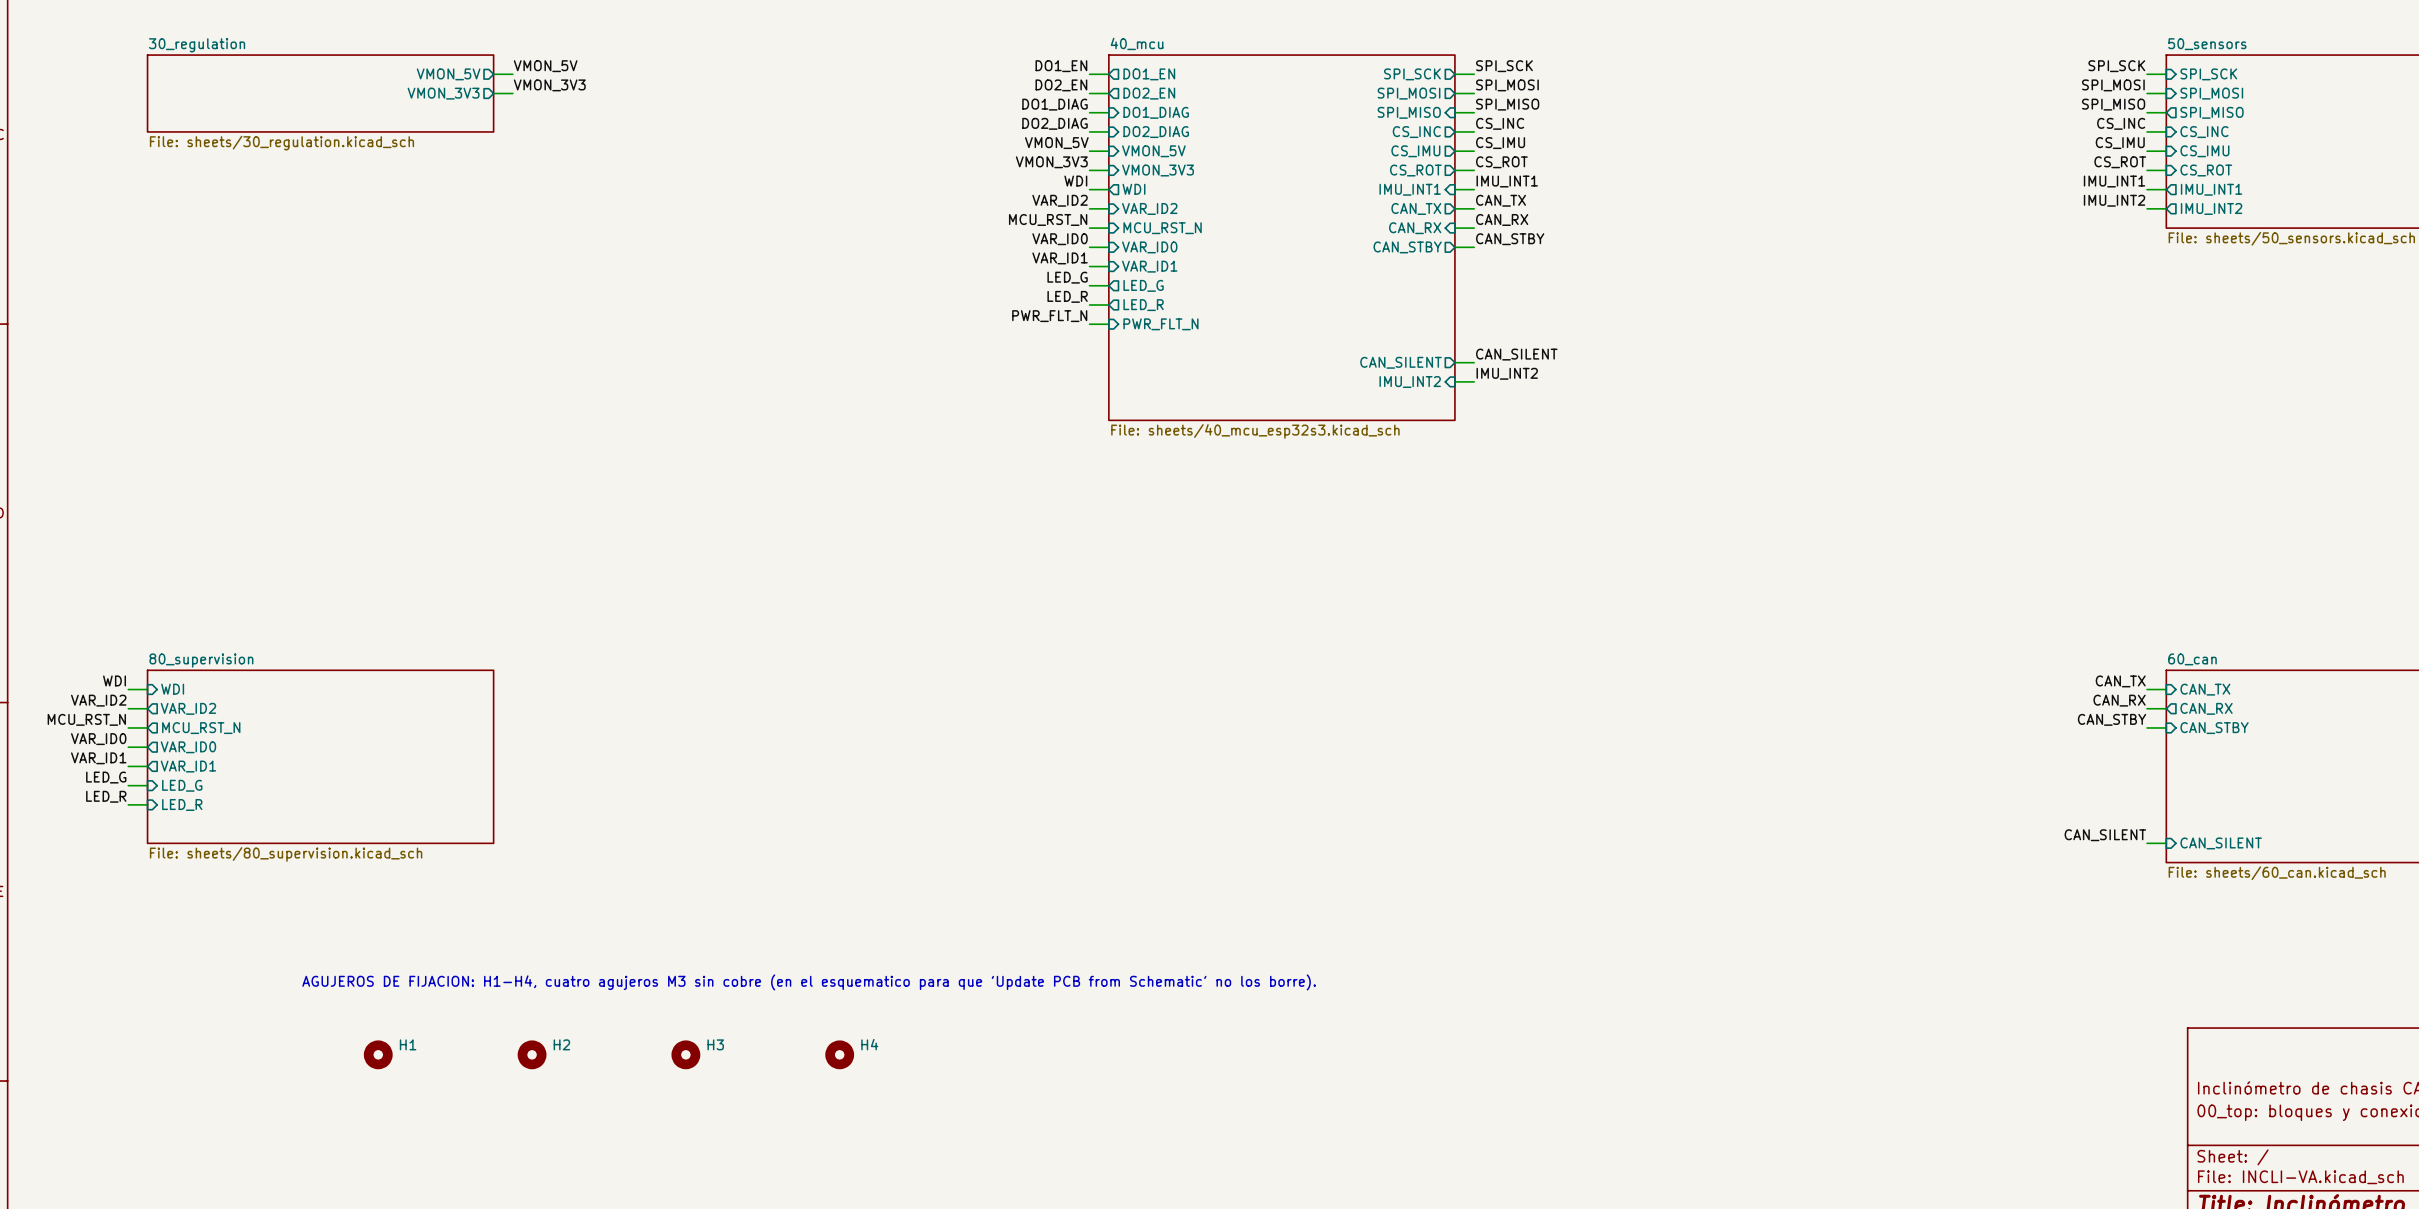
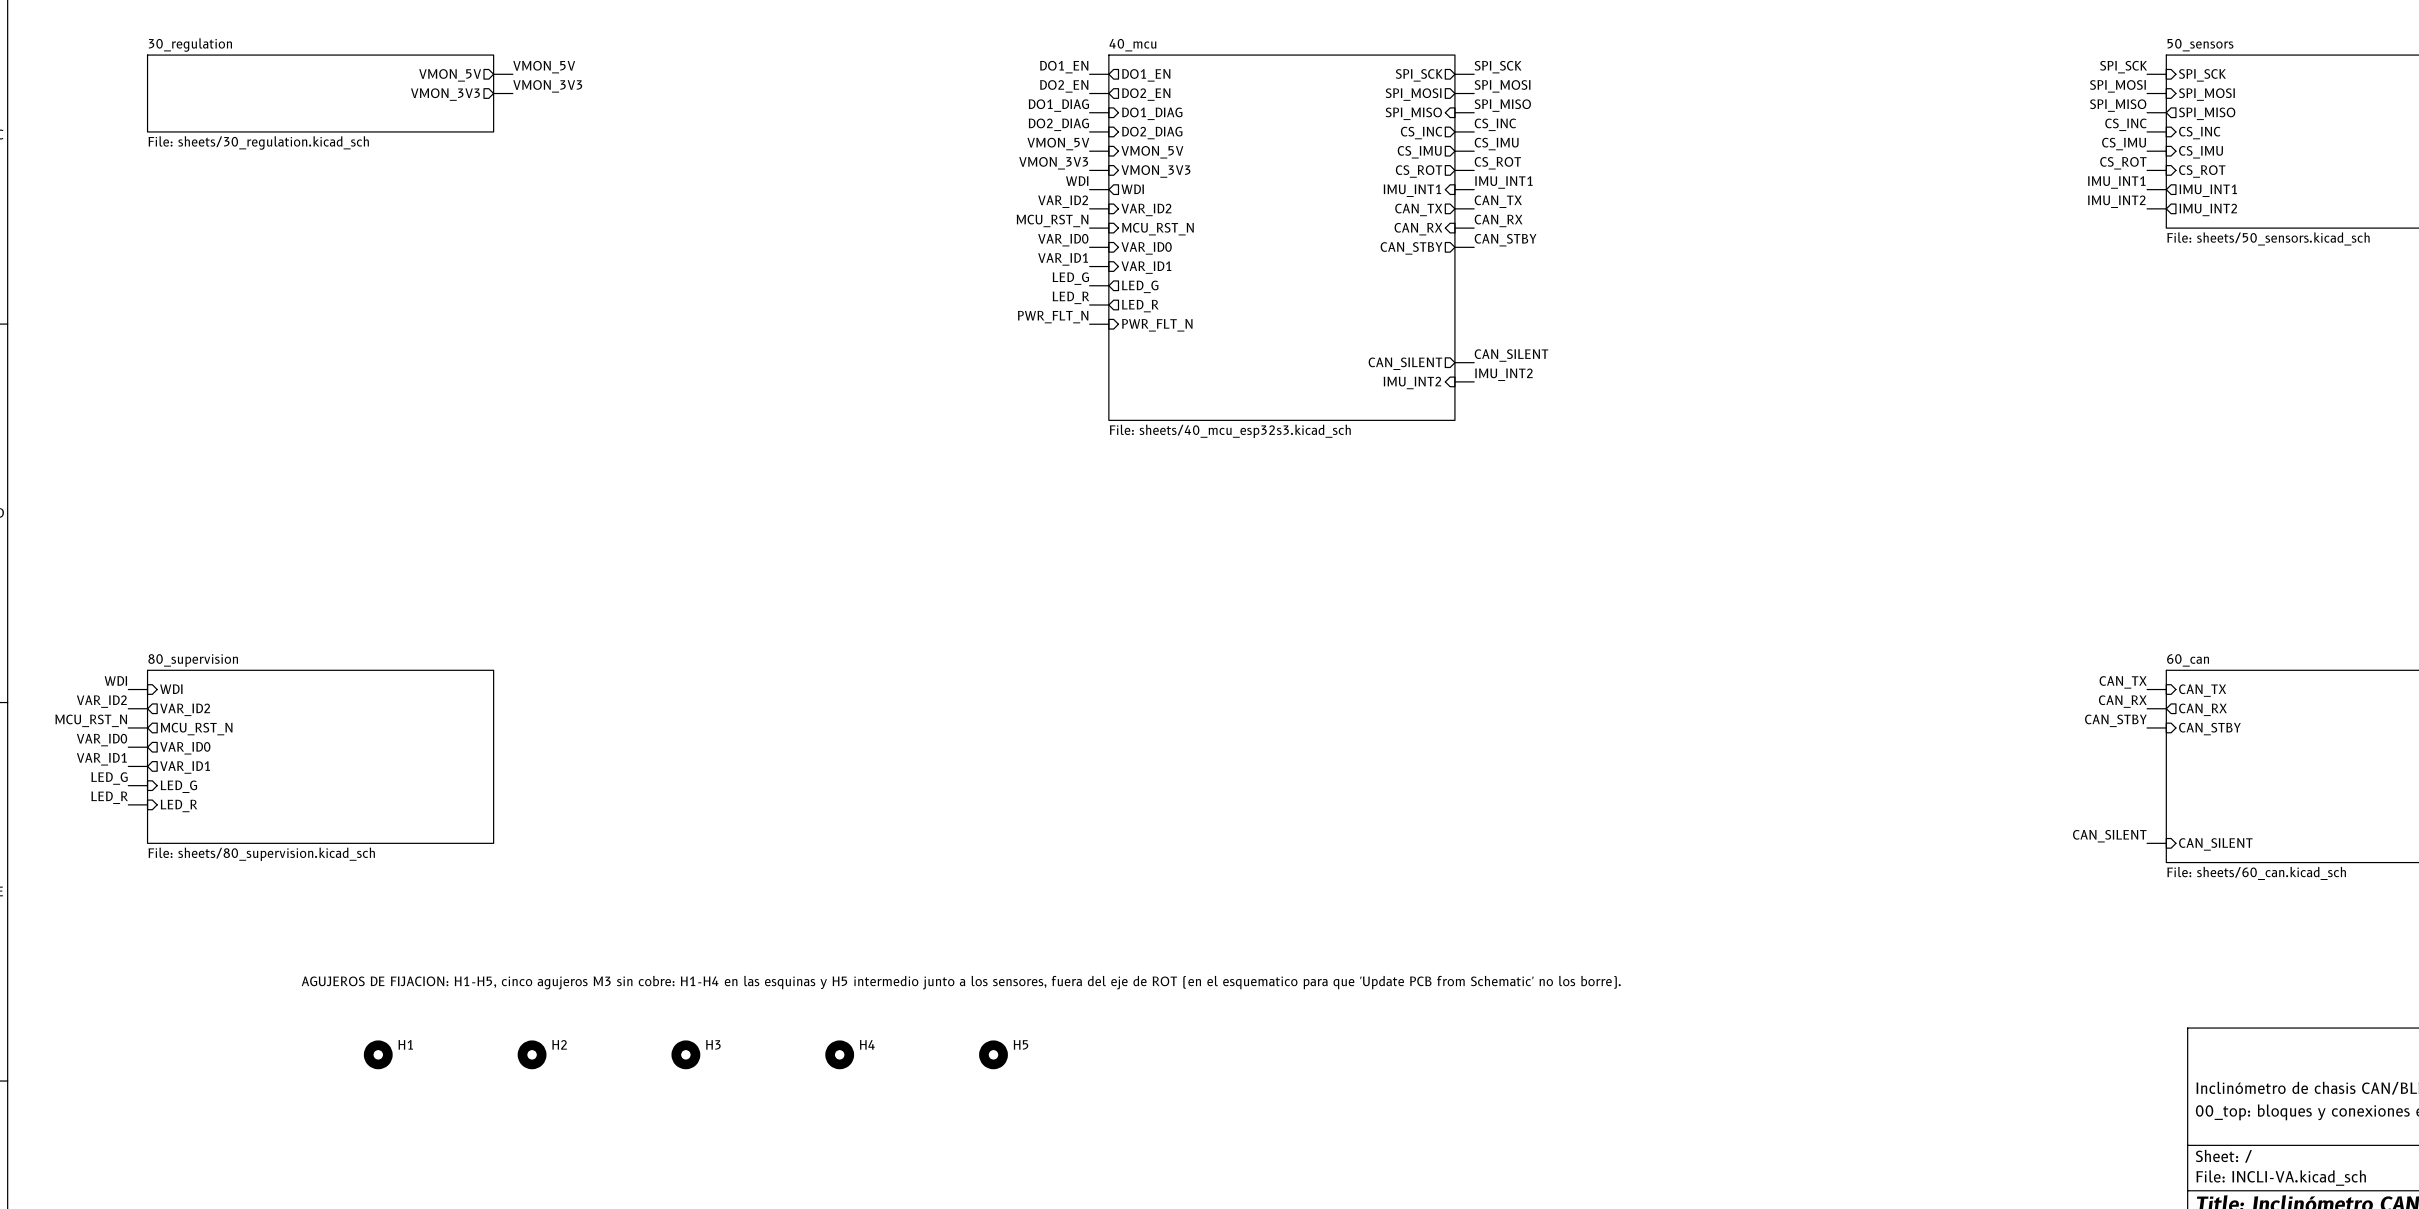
text: AGUJEROS DE FIJACION: H1-H4, cuatro agujeros M3 sin cobre (en el esquematico para que 'Update PCB from Schematic' no los borre). (809, 982) -> AGUJEROS DE FIJACION: H1-H5, cinco agujeros M3 sin cobre: H1-H4 en las esquinas y H5 intermedio junto a los sensores, fuera del eje de ROT (en el esquematico para que 'Update PCB from Schematic' no los borre). (961, 982)
H5: none -> (993, 1054)

